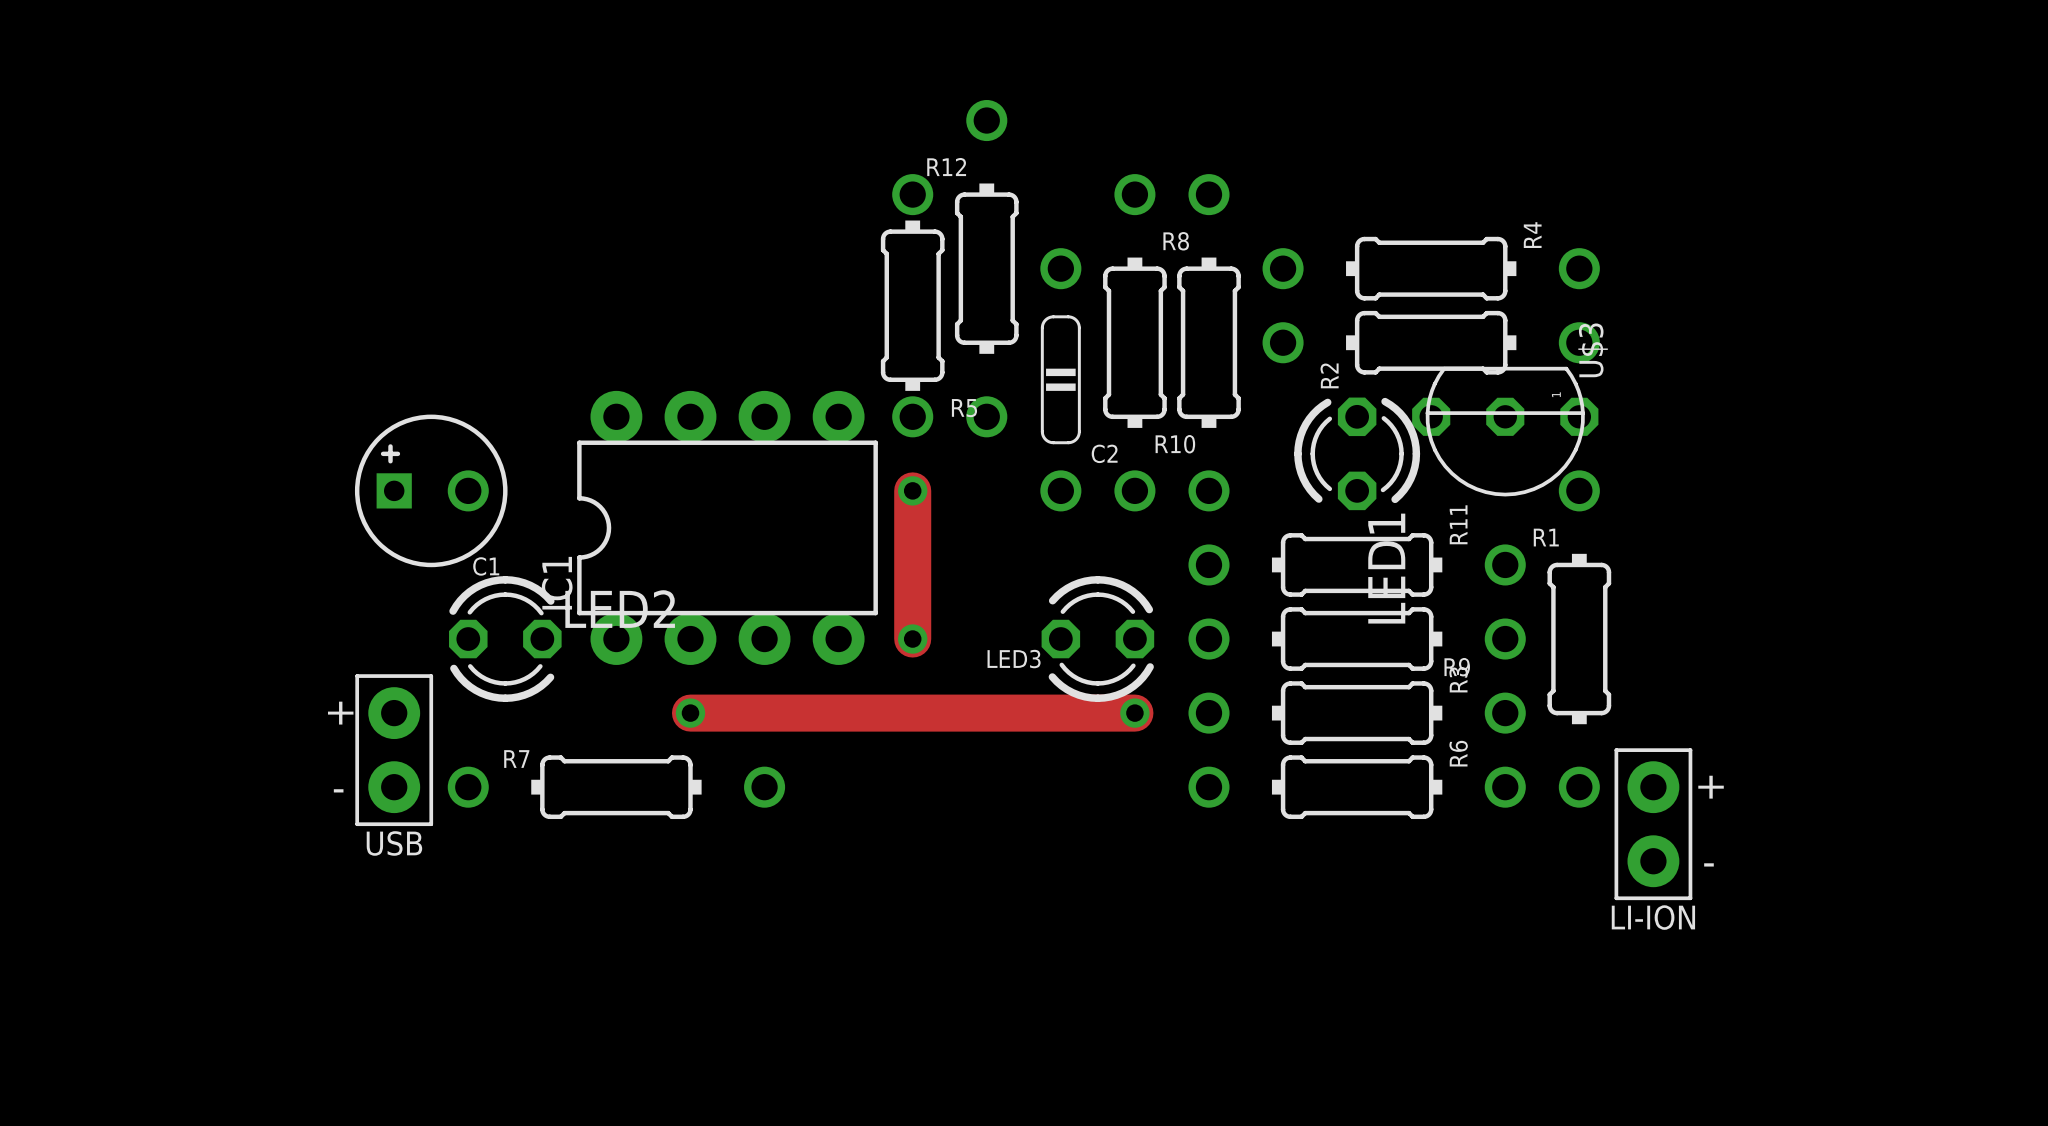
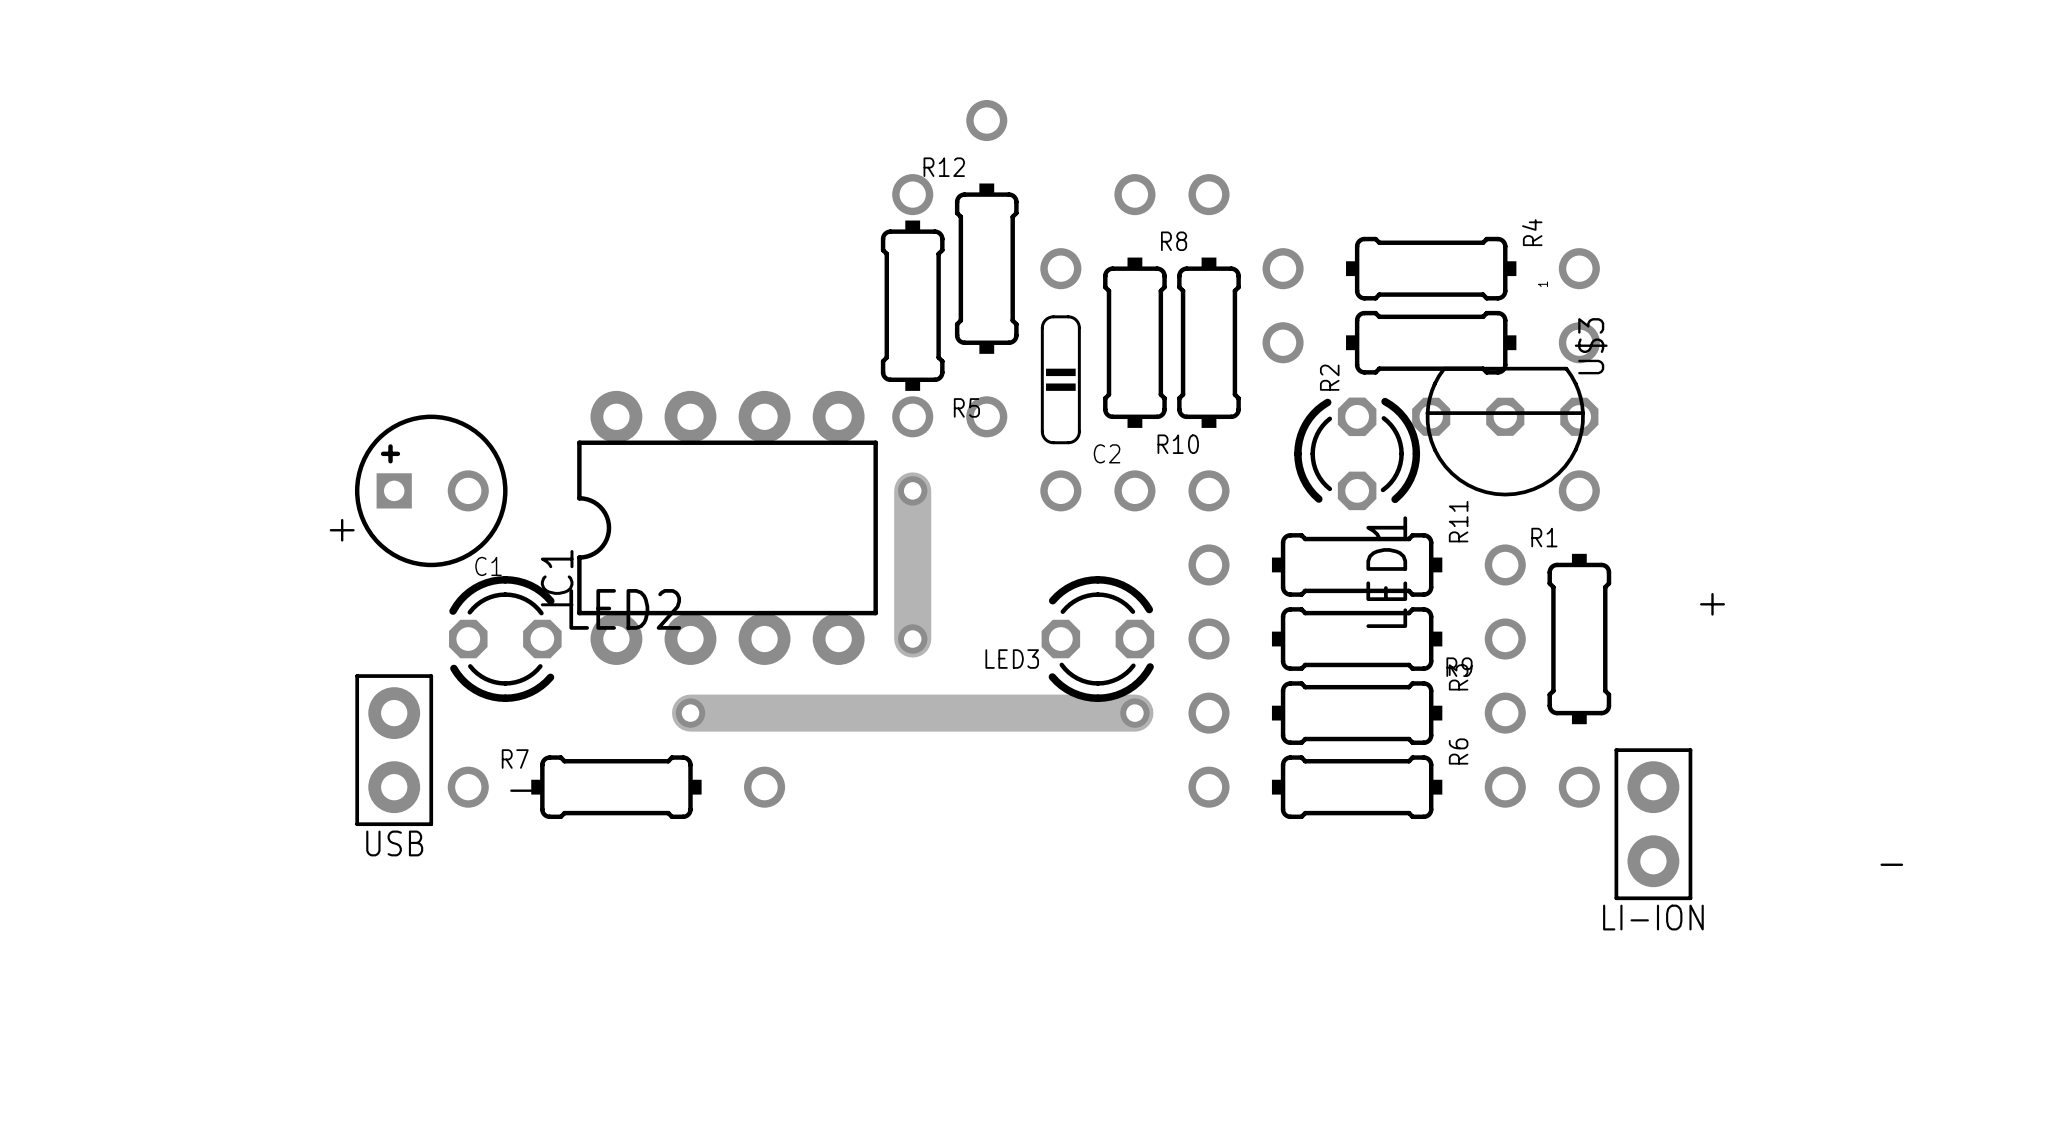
U$3 text: none -> 1 (1543, 284)
U$3 text: 1 (1556, 394) -> none
USB footprint: [355, 674, 434, 827] -> [355, 674, 434, 827]
LI-ION footprint: [1614, 748, 1693, 901] -> [1614, 748, 1693, 901]

